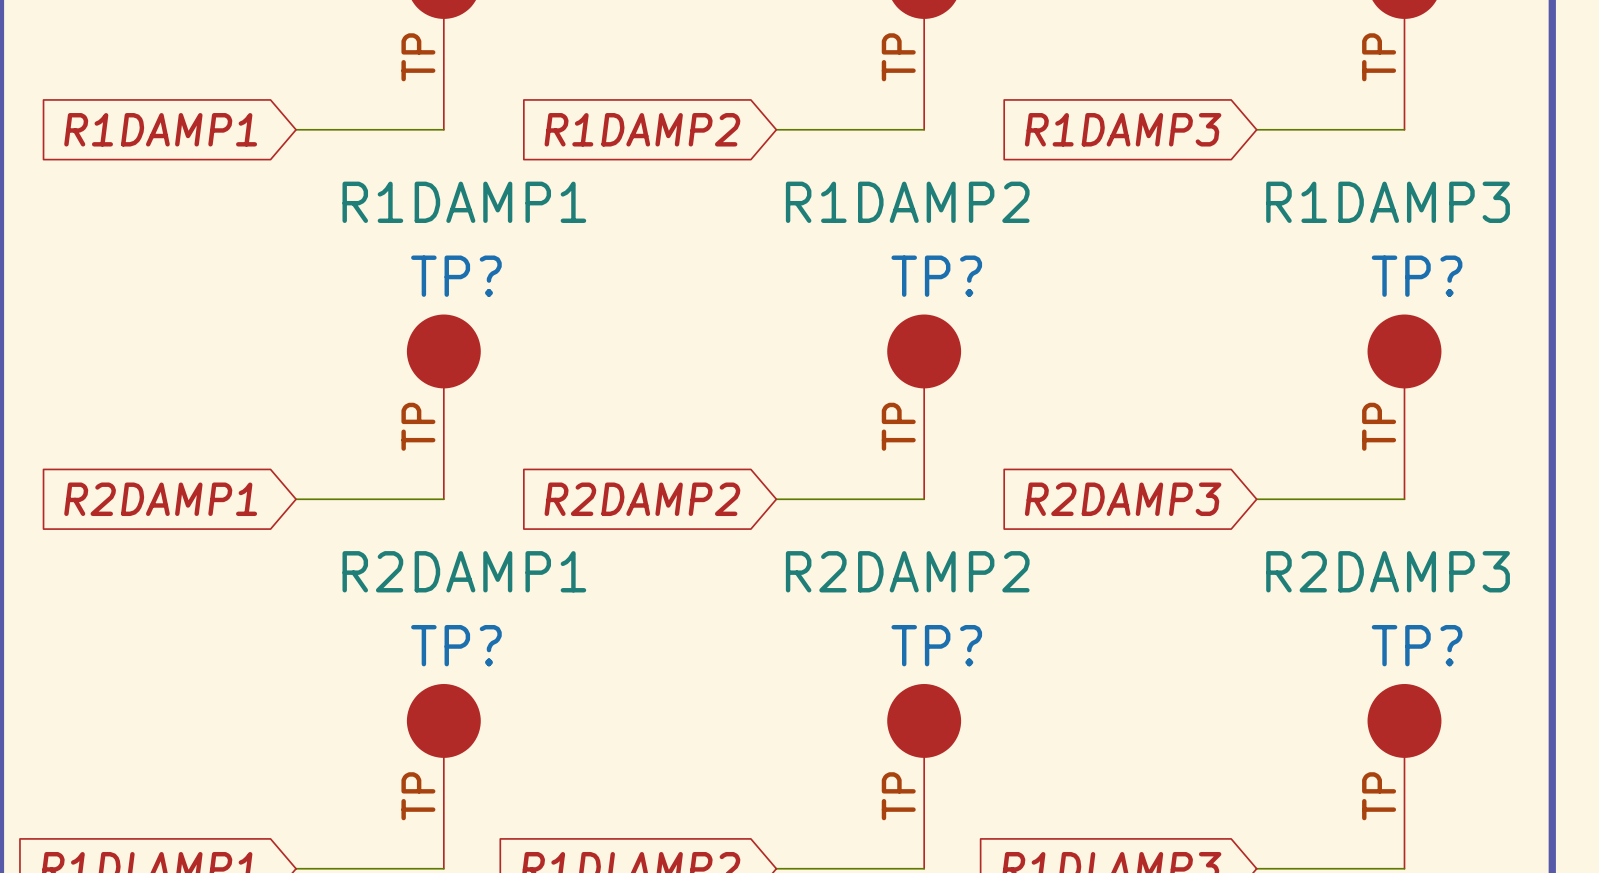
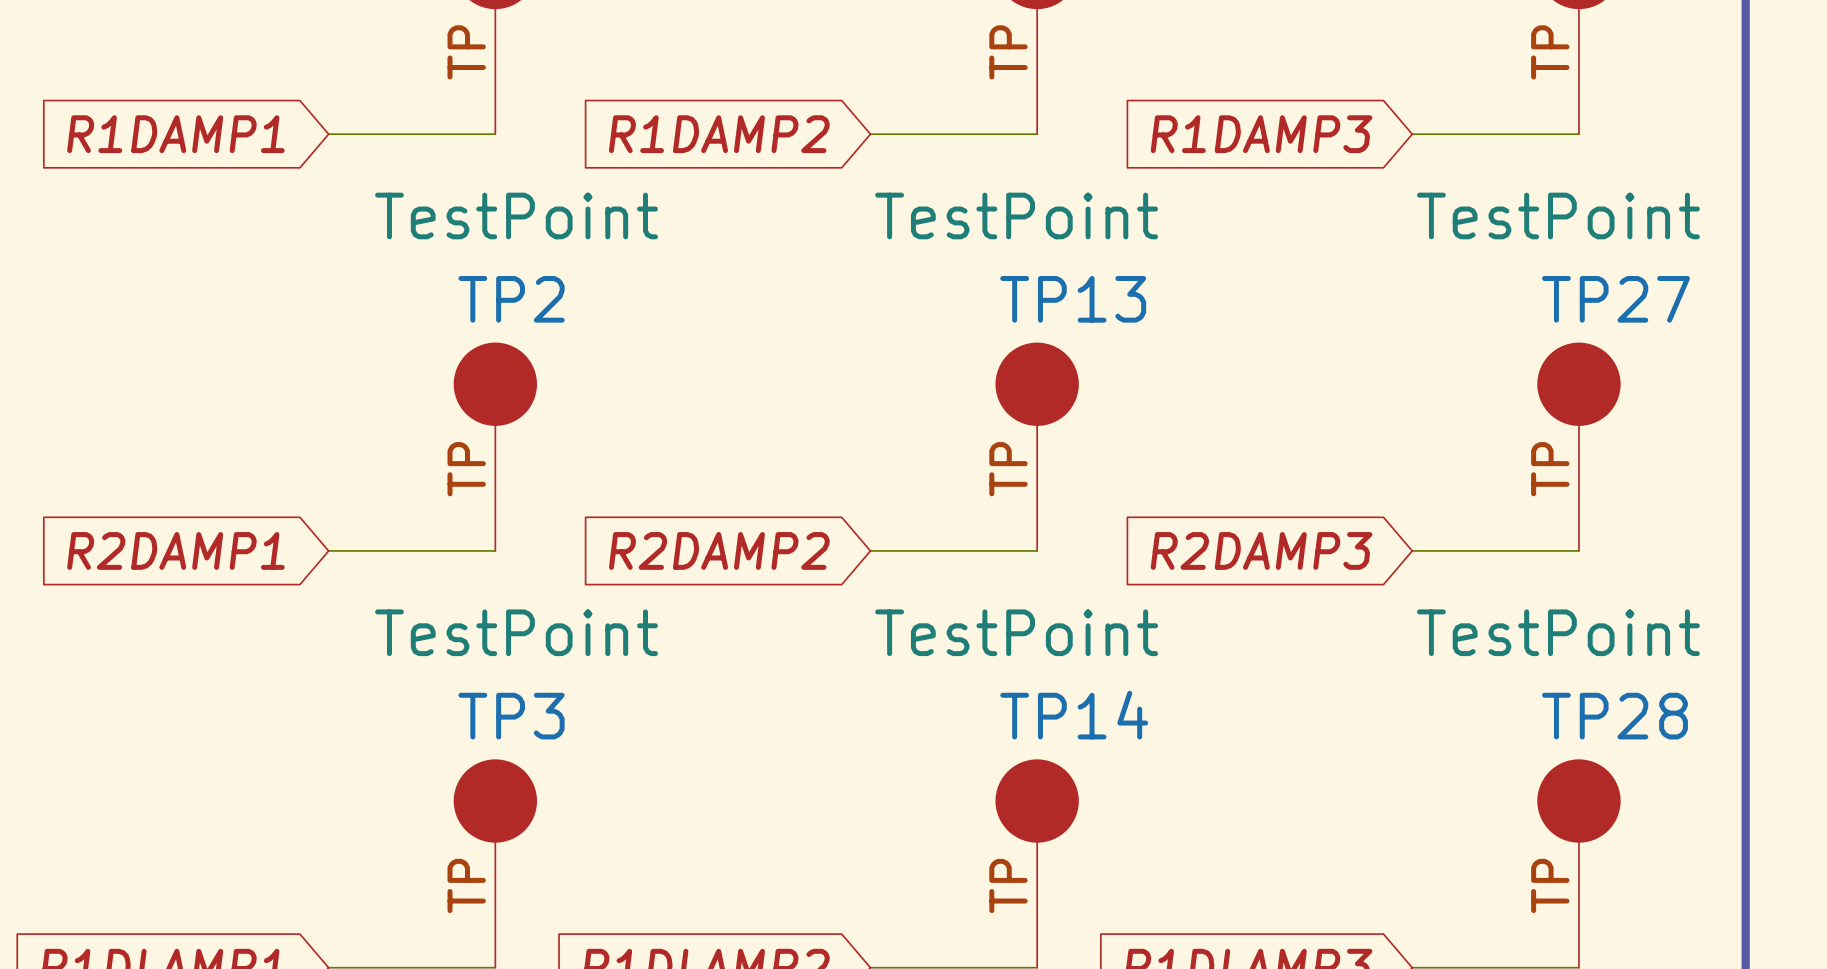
part value: R1DAMP1 (464, 202) -> TestPoint (516, 215)
part value: R1DAMP2 (907, 202) -> TestPoint (1016, 215)
part value: R1DAMP3 (1388, 202) -> TestPoint (1558, 215)
TP? name: TP? (456, 276) -> TP2 (511, 299)
TP? name: TP? (936, 276) -> TP13 (1073, 299)
TP? name: TP? (1417, 276) -> TP27 (1615, 299)
TP? value: R2DAMP1 (464, 571) -> TestPoint (516, 632)
TP? value: R2DAMP2 (907, 571) -> TestPoint (1016, 632)
TP? value: R2DAMP3 (1388, 571) -> TestPoint (1558, 632)
TP? name: TP? (456, 645) -> TP3 (511, 716)
TP? name: TP? (936, 645) -> TP14 (1074, 715)
TP? name: TP? (1417, 645) -> TP28 (1614, 716)

